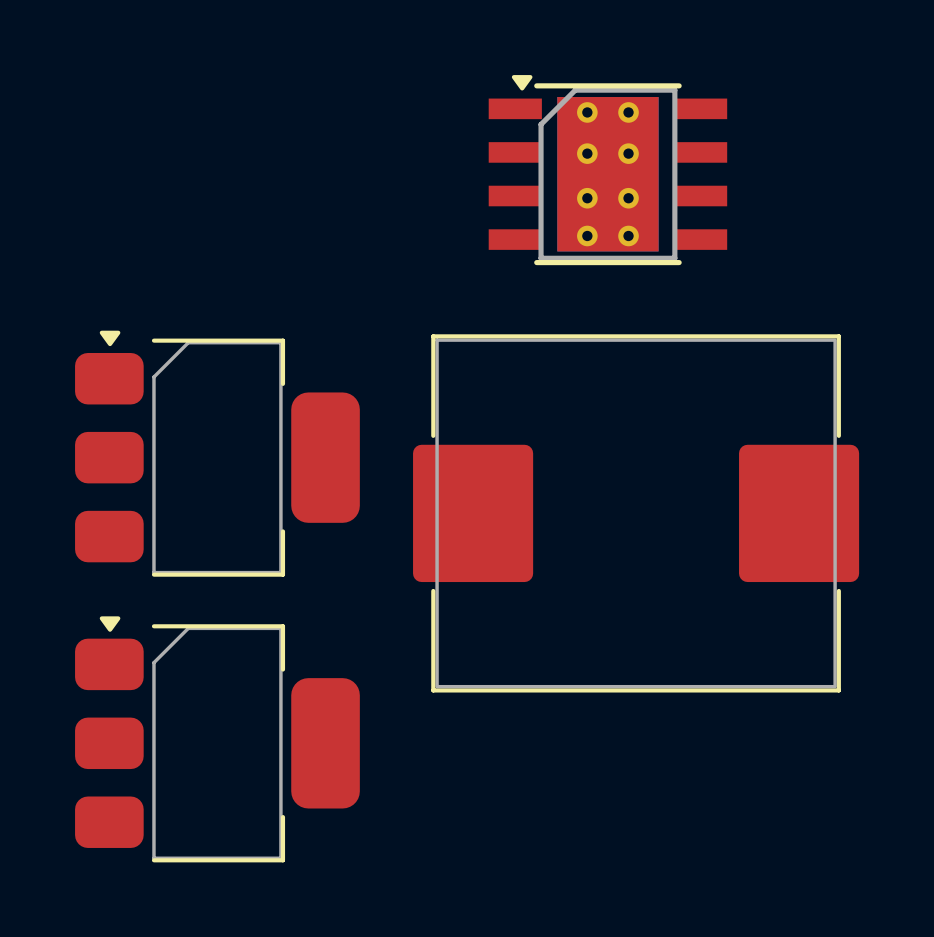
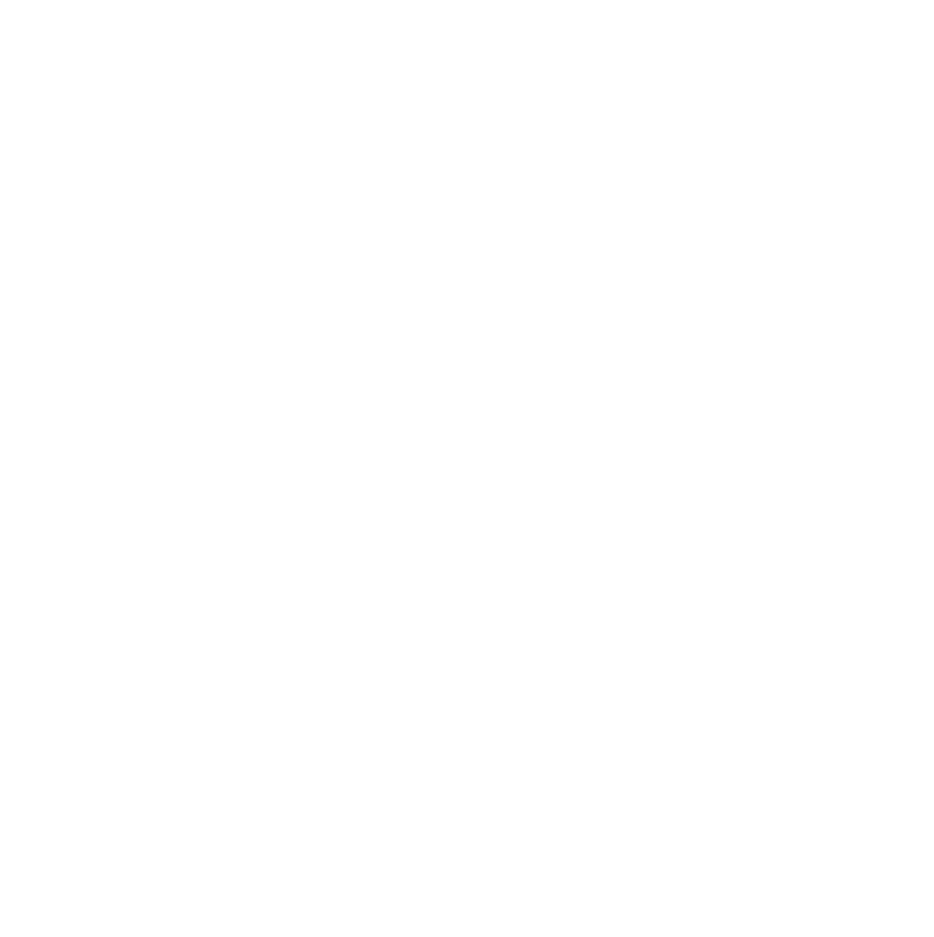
part: (607, 170) -> none
part: (217, 453) -> none
part: (636, 513) -> none
part: (217, 739) -> none

